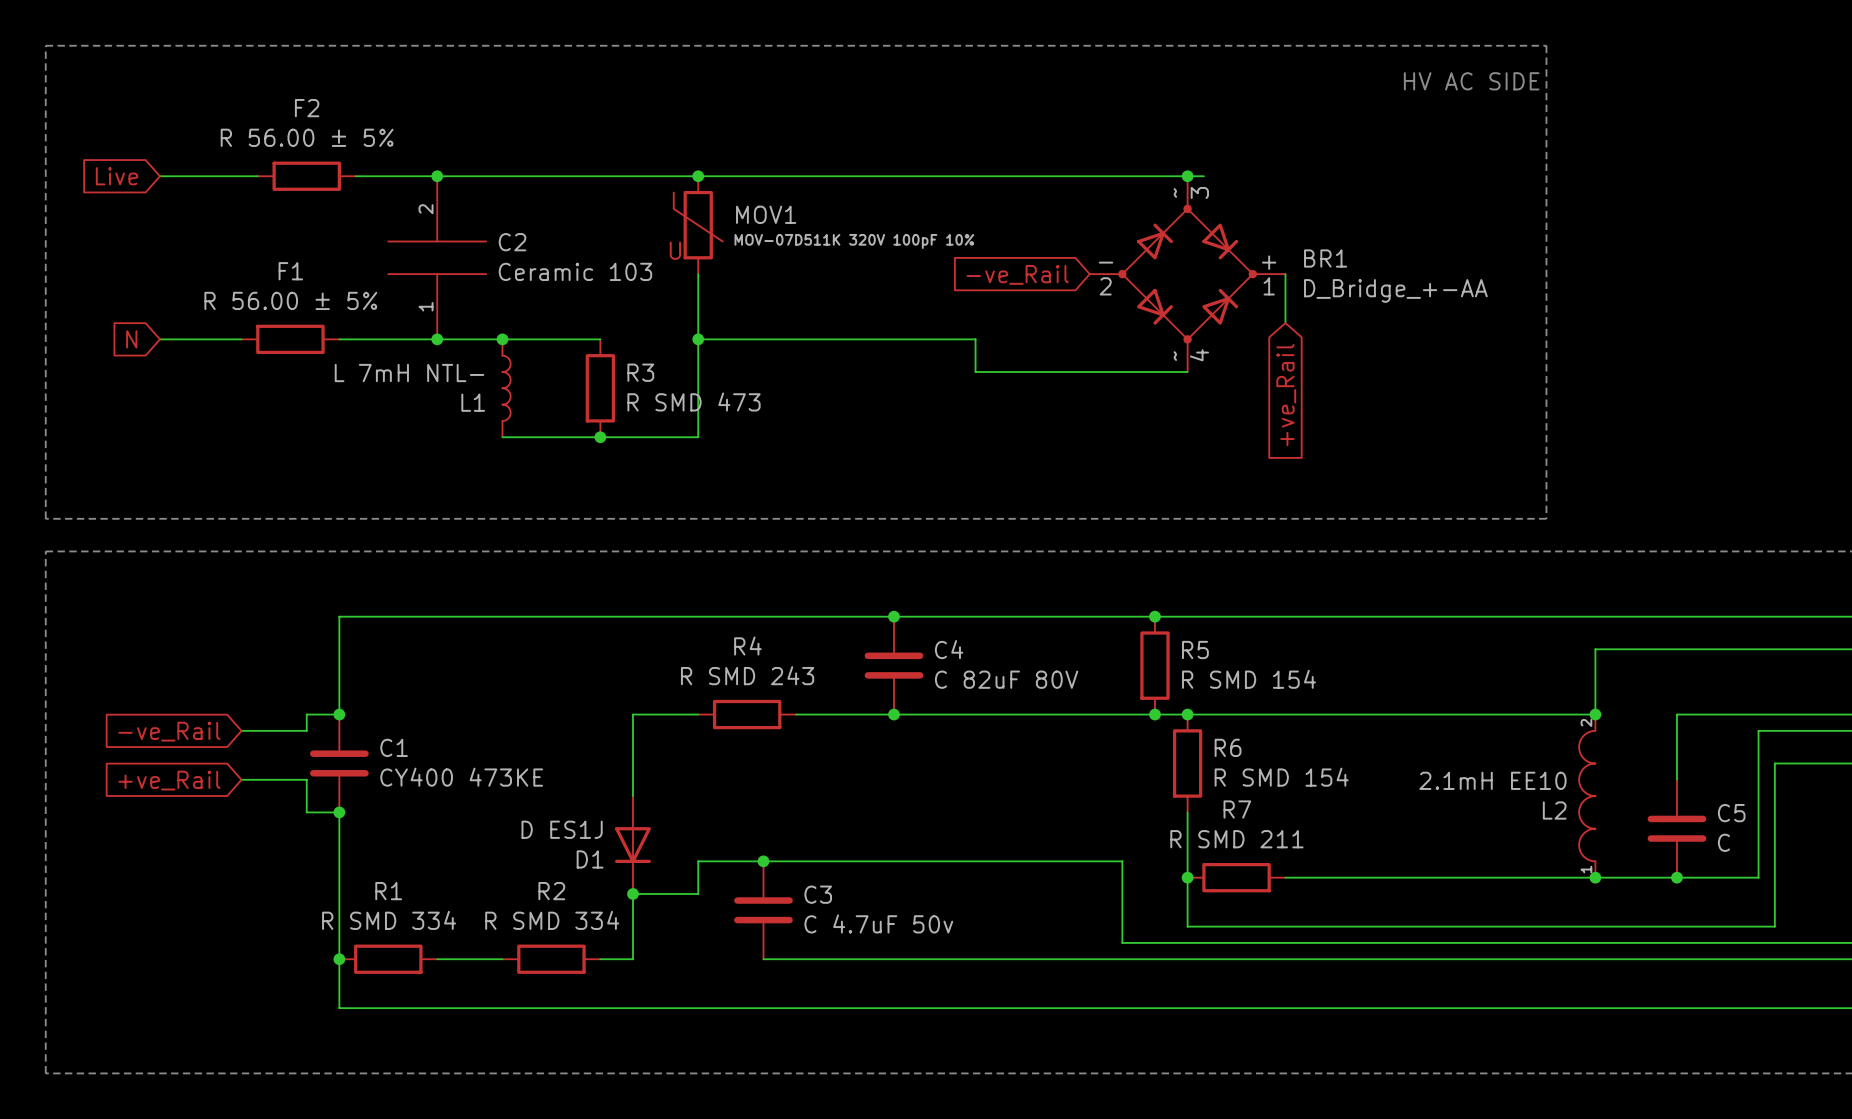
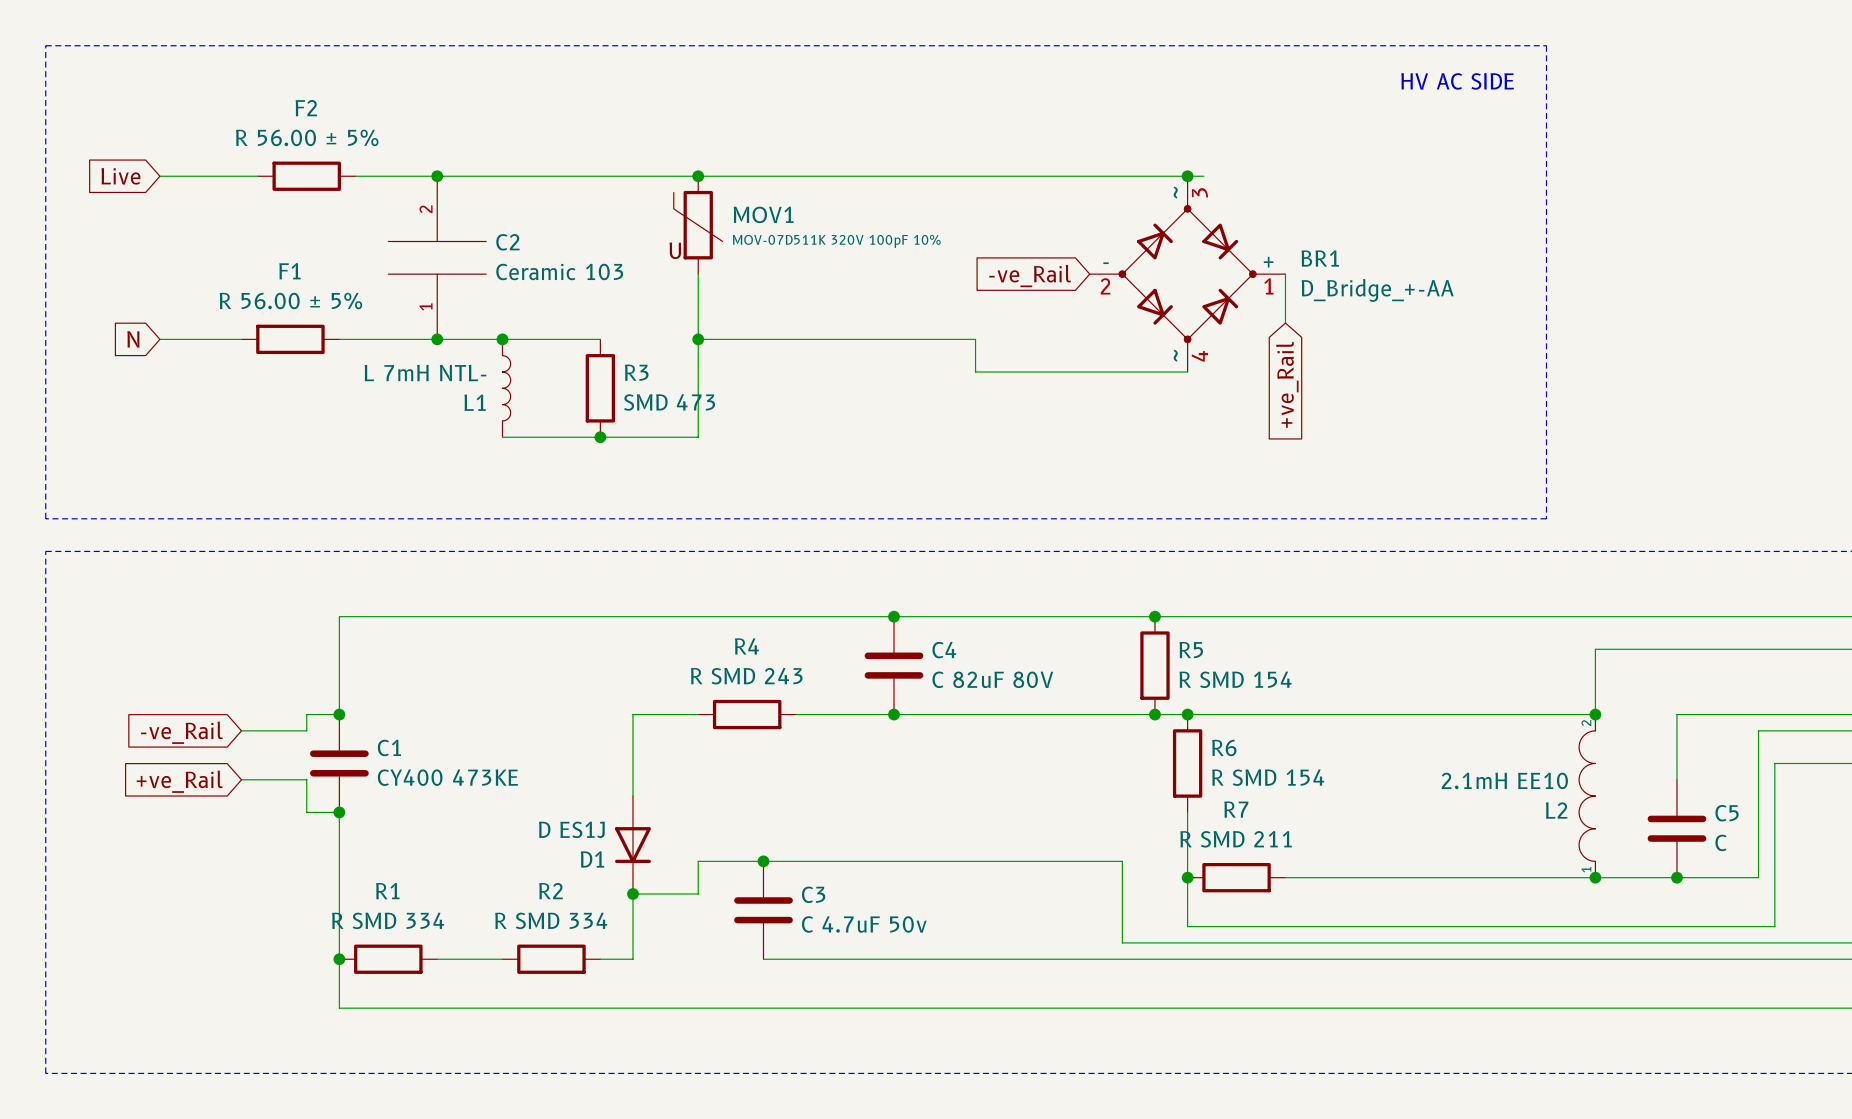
R3 value: R SMD 473 (694, 401) -> SMD 473 (669, 402)

